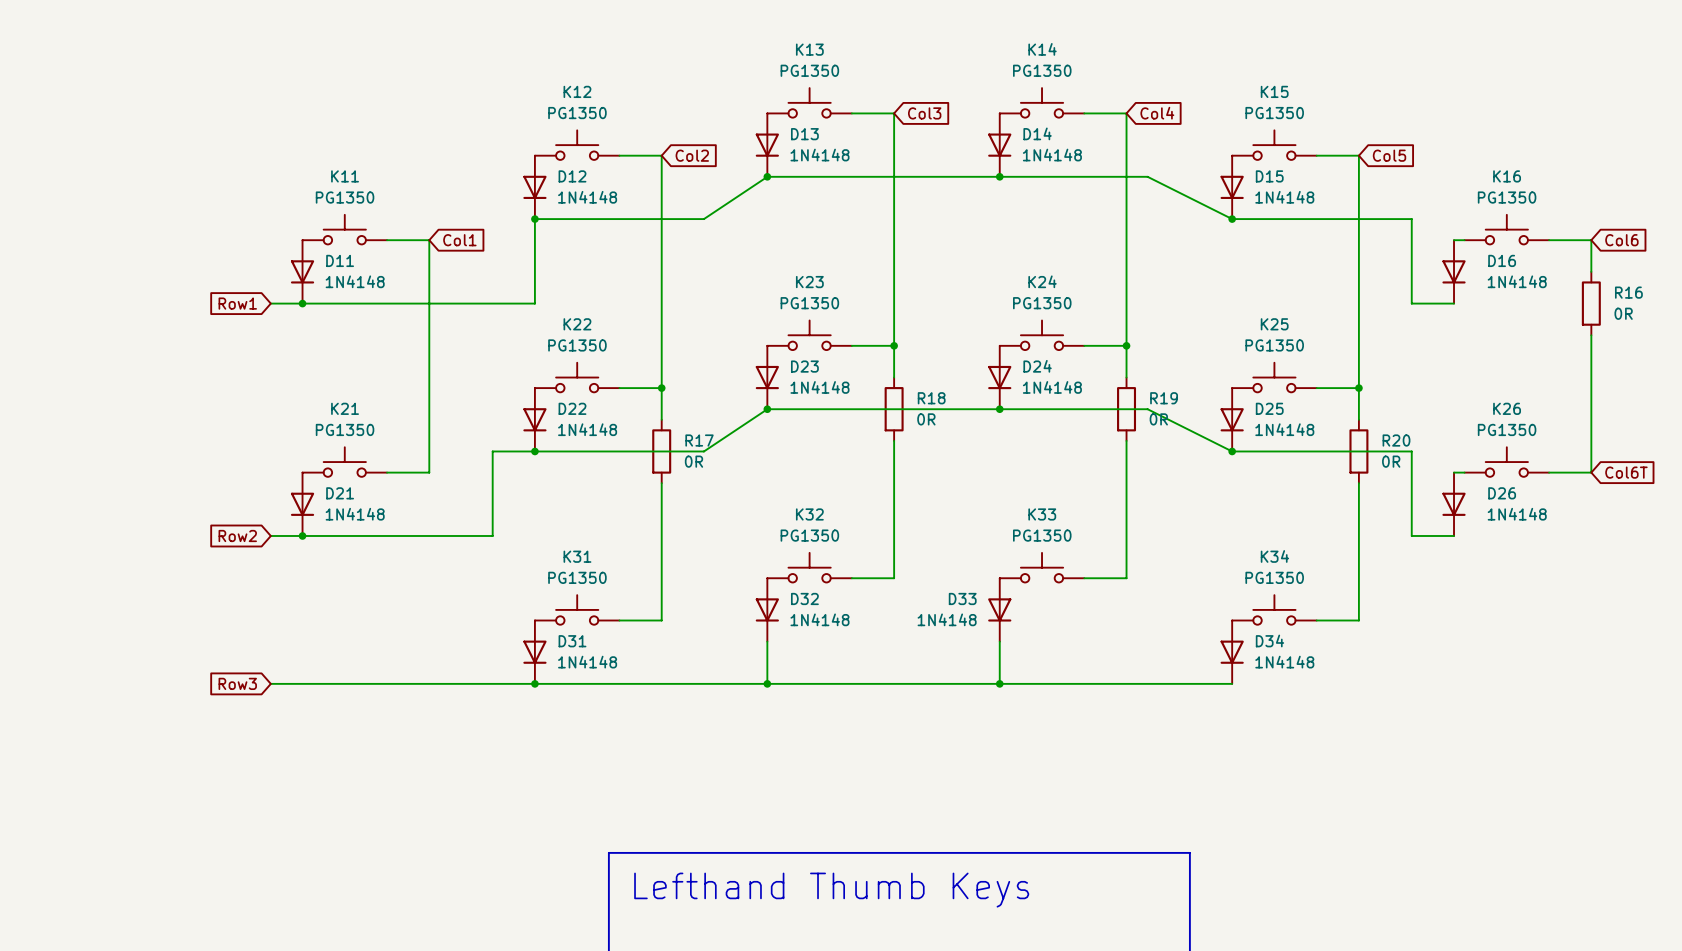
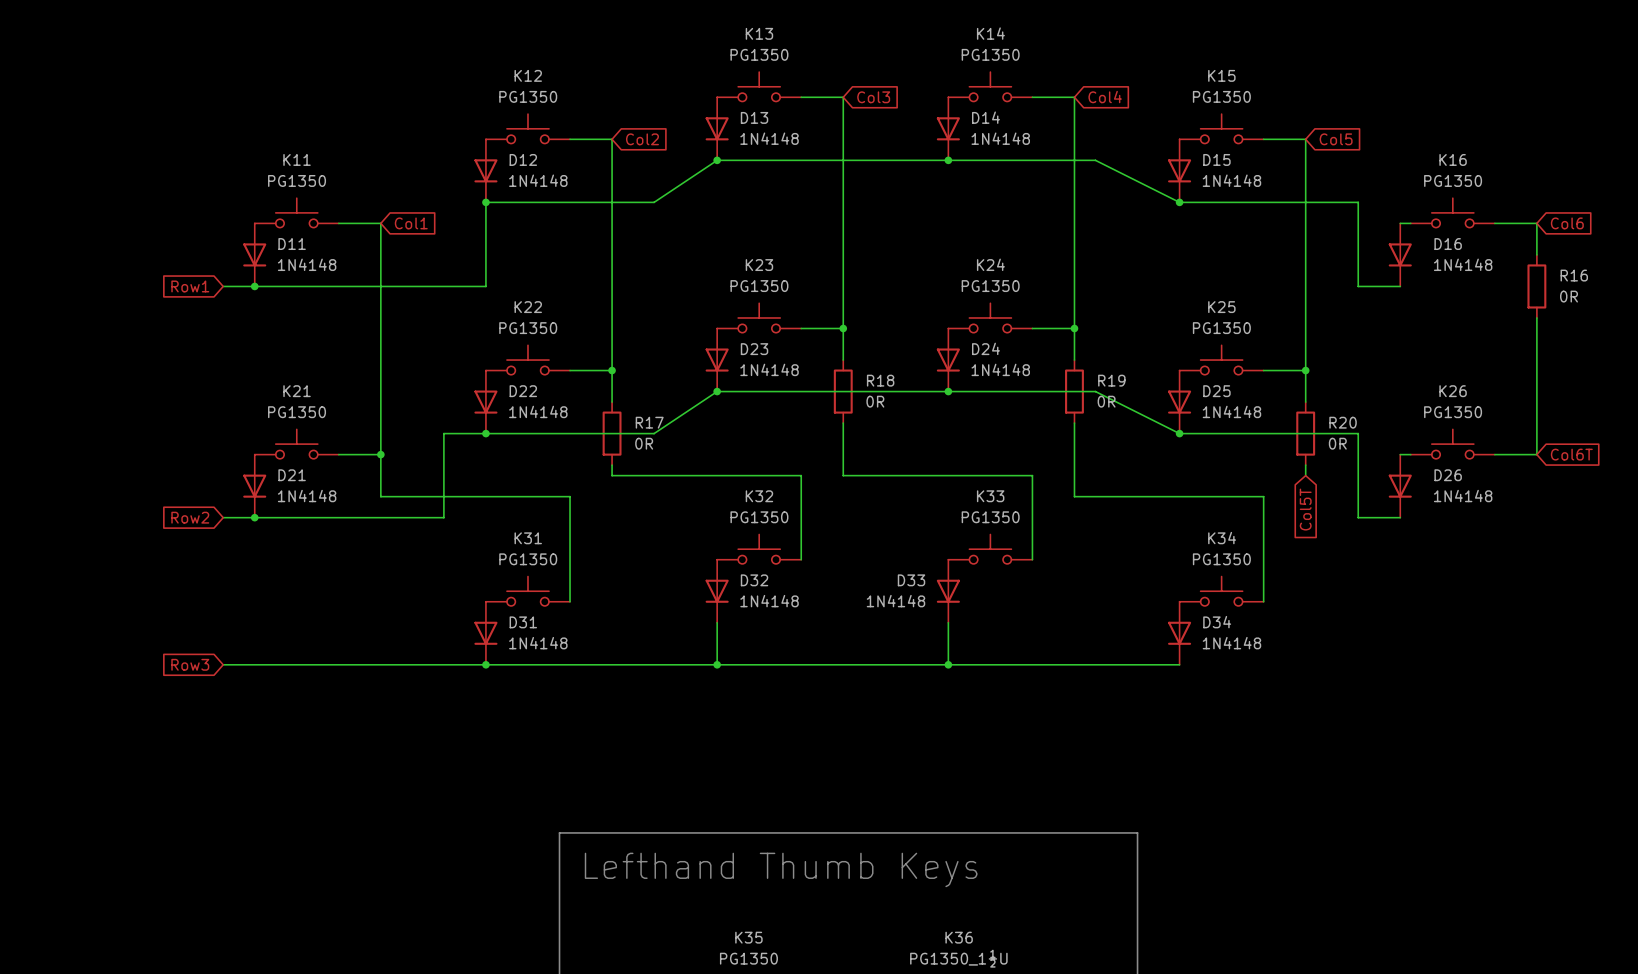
junction: none -> (380, 454)
wire: (661, 493) (661, 620) (619, 620) -> (380, 454) (380, 496) (570, 496) (570, 601)
wire: (894, 493) (894, 578) (851, 578) -> (612, 475) (801, 475) (801, 559)
wire: (1358, 493) (1358, 620) (1316, 620) -> (1074, 496) (1263, 496) (1263, 601)
wire: (1126, 514) (1126, 578) (1084, 578) -> (843, 475) (1032, 475) (1032, 559)
global label: none -> Col5T (1305, 509)

